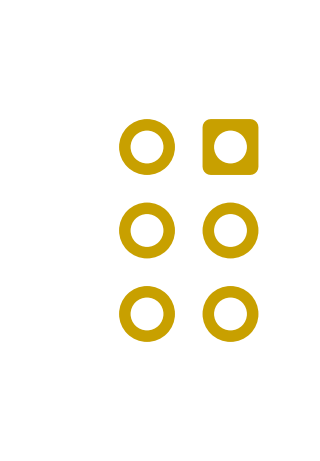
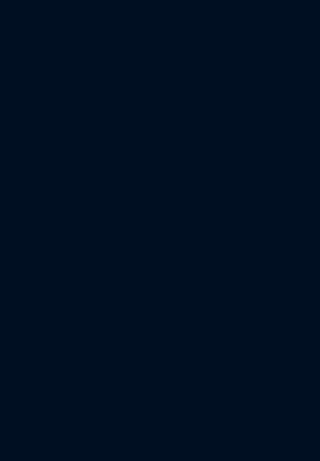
part: (188, 230) -> none

